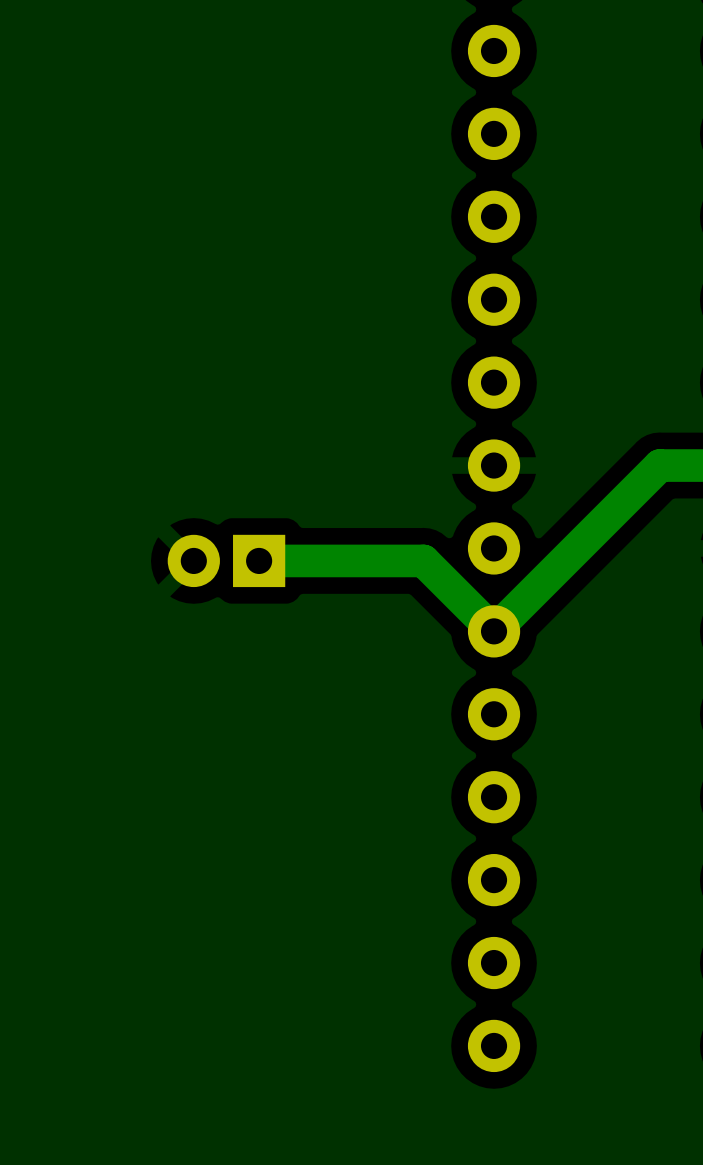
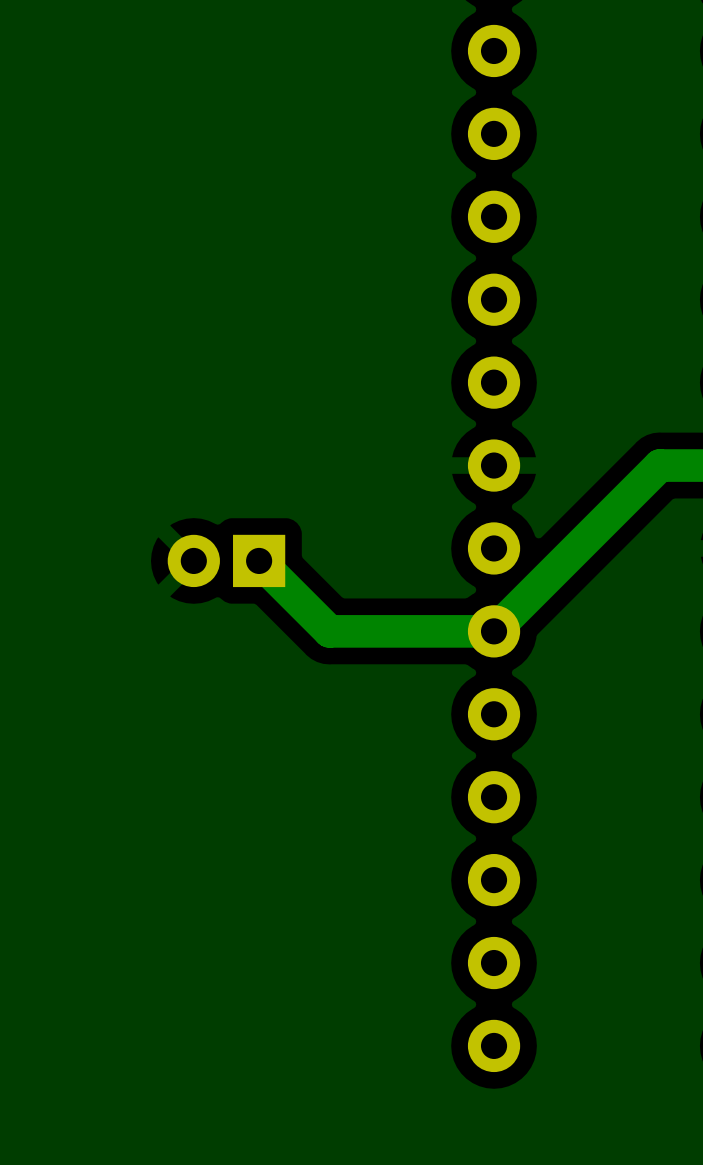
bottom track: (259, 560) (423, 560) (494, 631) -> (259, 560) (329, 631) (494, 631)

